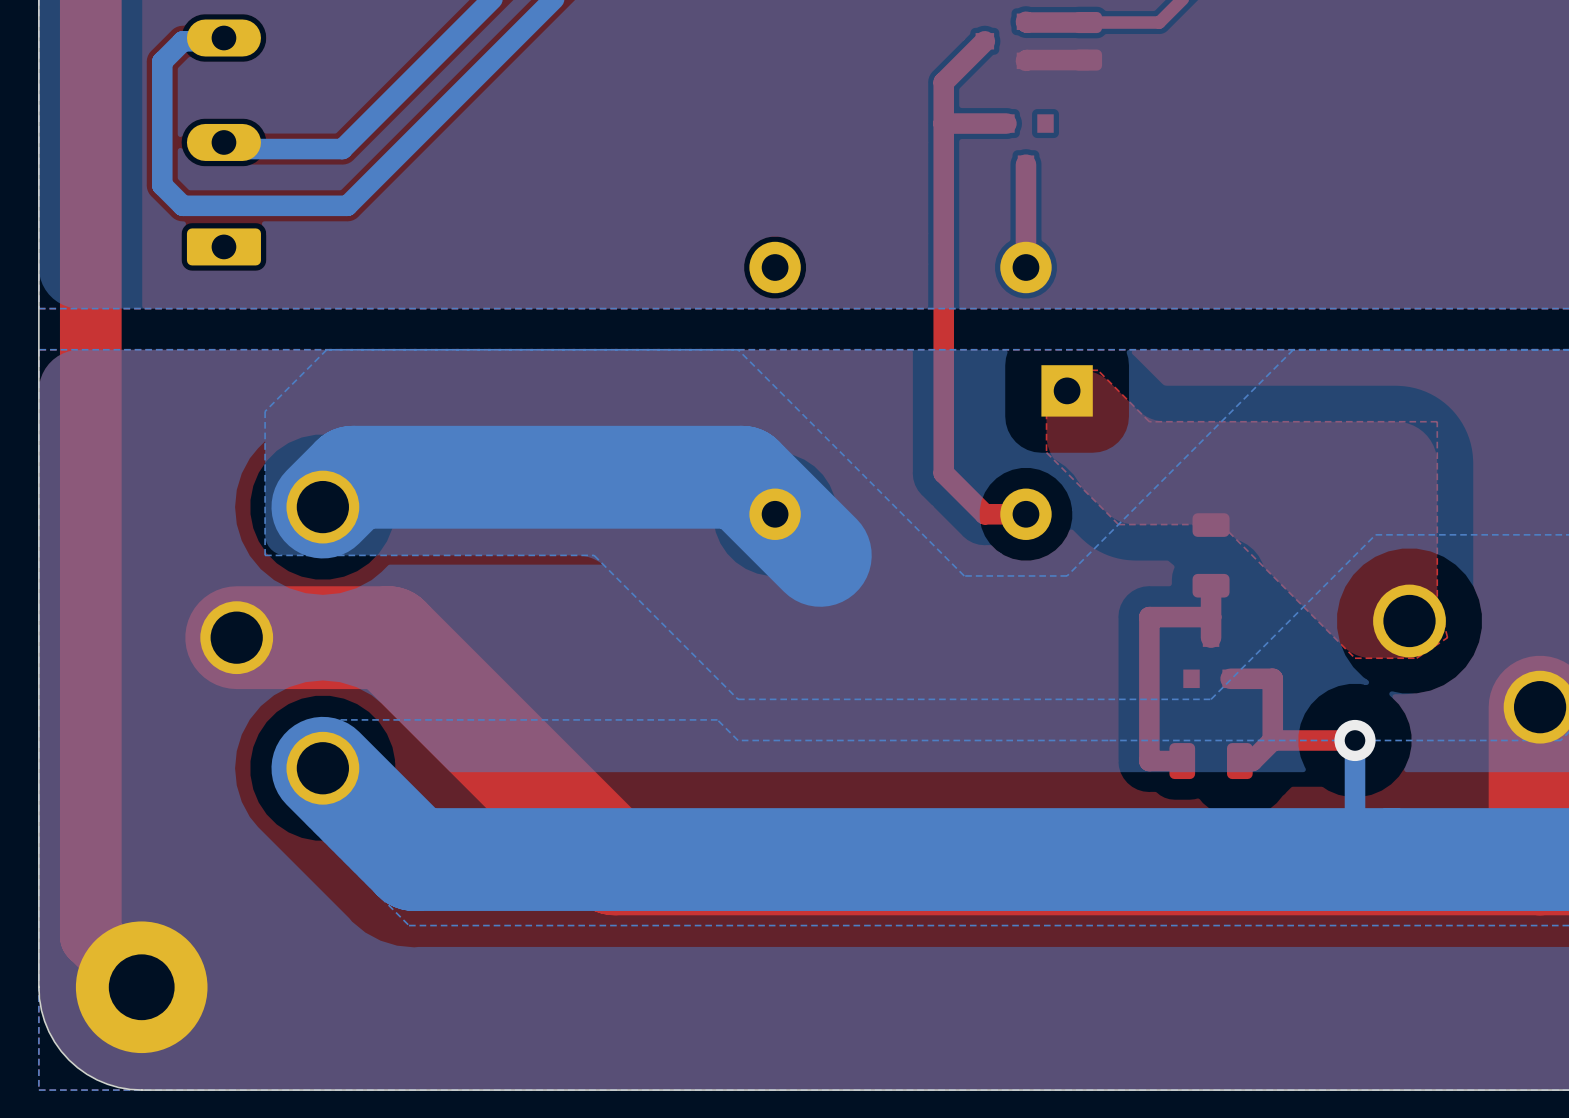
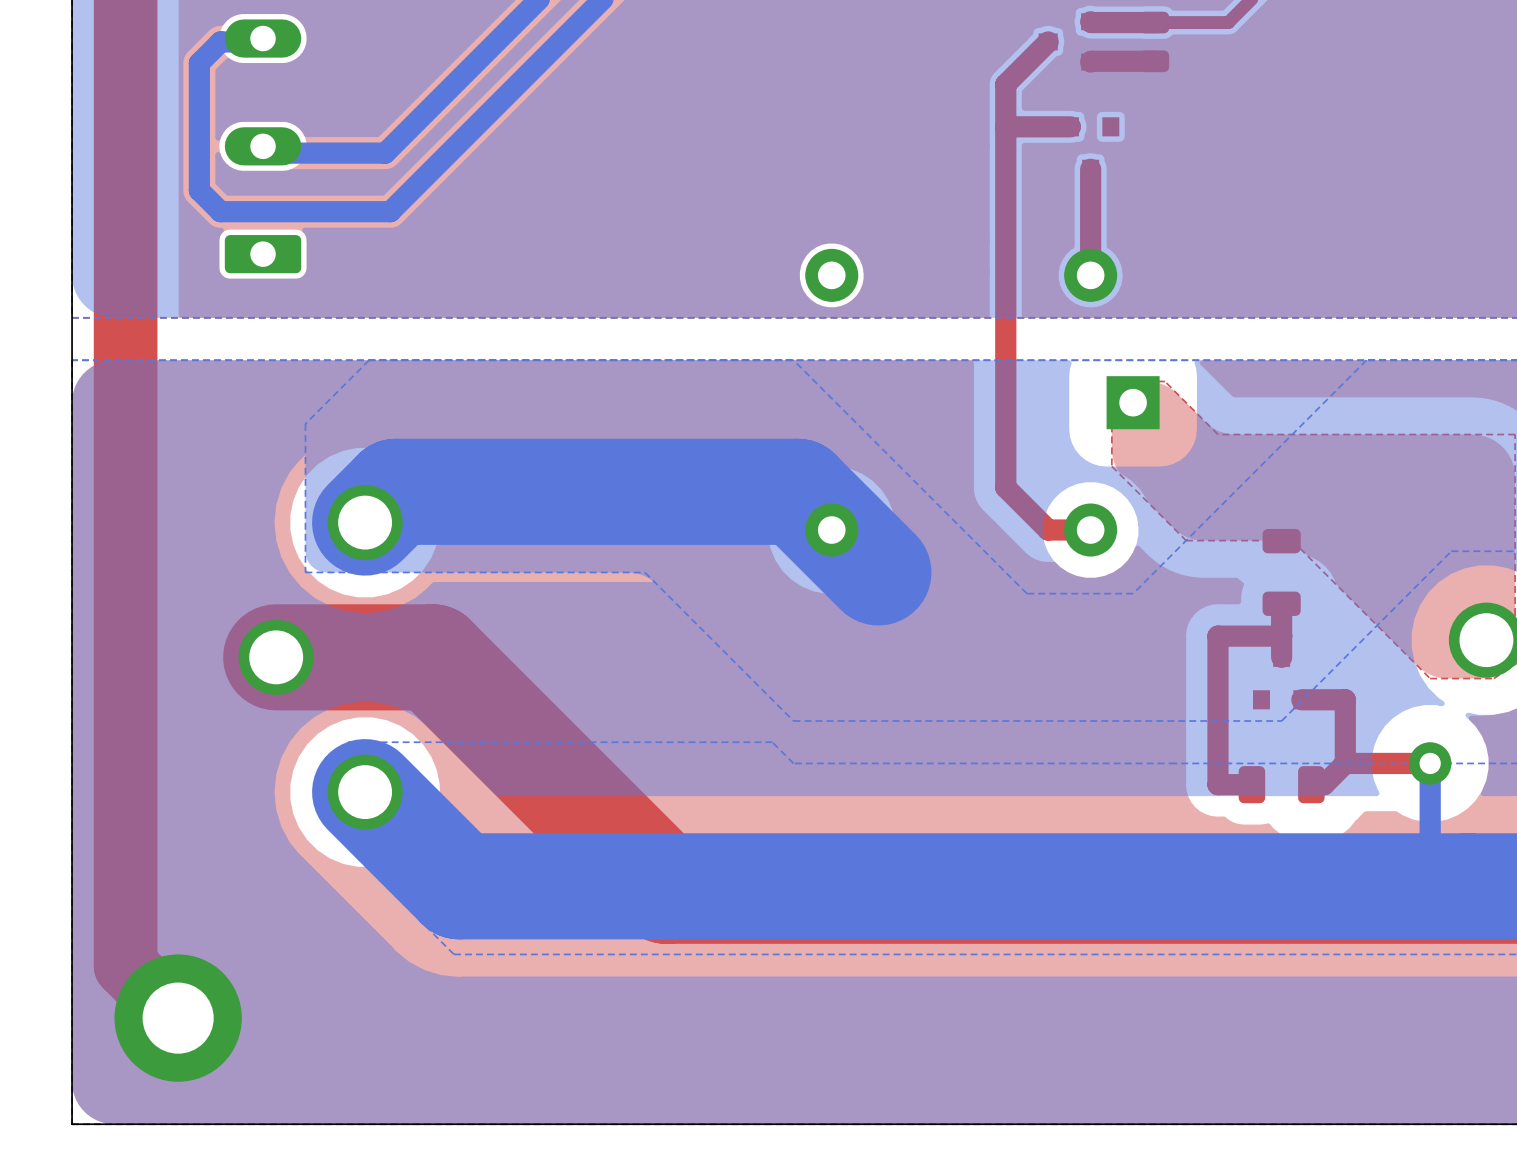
board edge: (38, 987) (44, 1021) (54, 1041) (69, 1059) (97, 1079) (118, 1087) (141, 1090) -> (72, 1018) (72, 1124) (178, 1124)
part: (141, 987) -> none
via: none -> (178, 1018)

